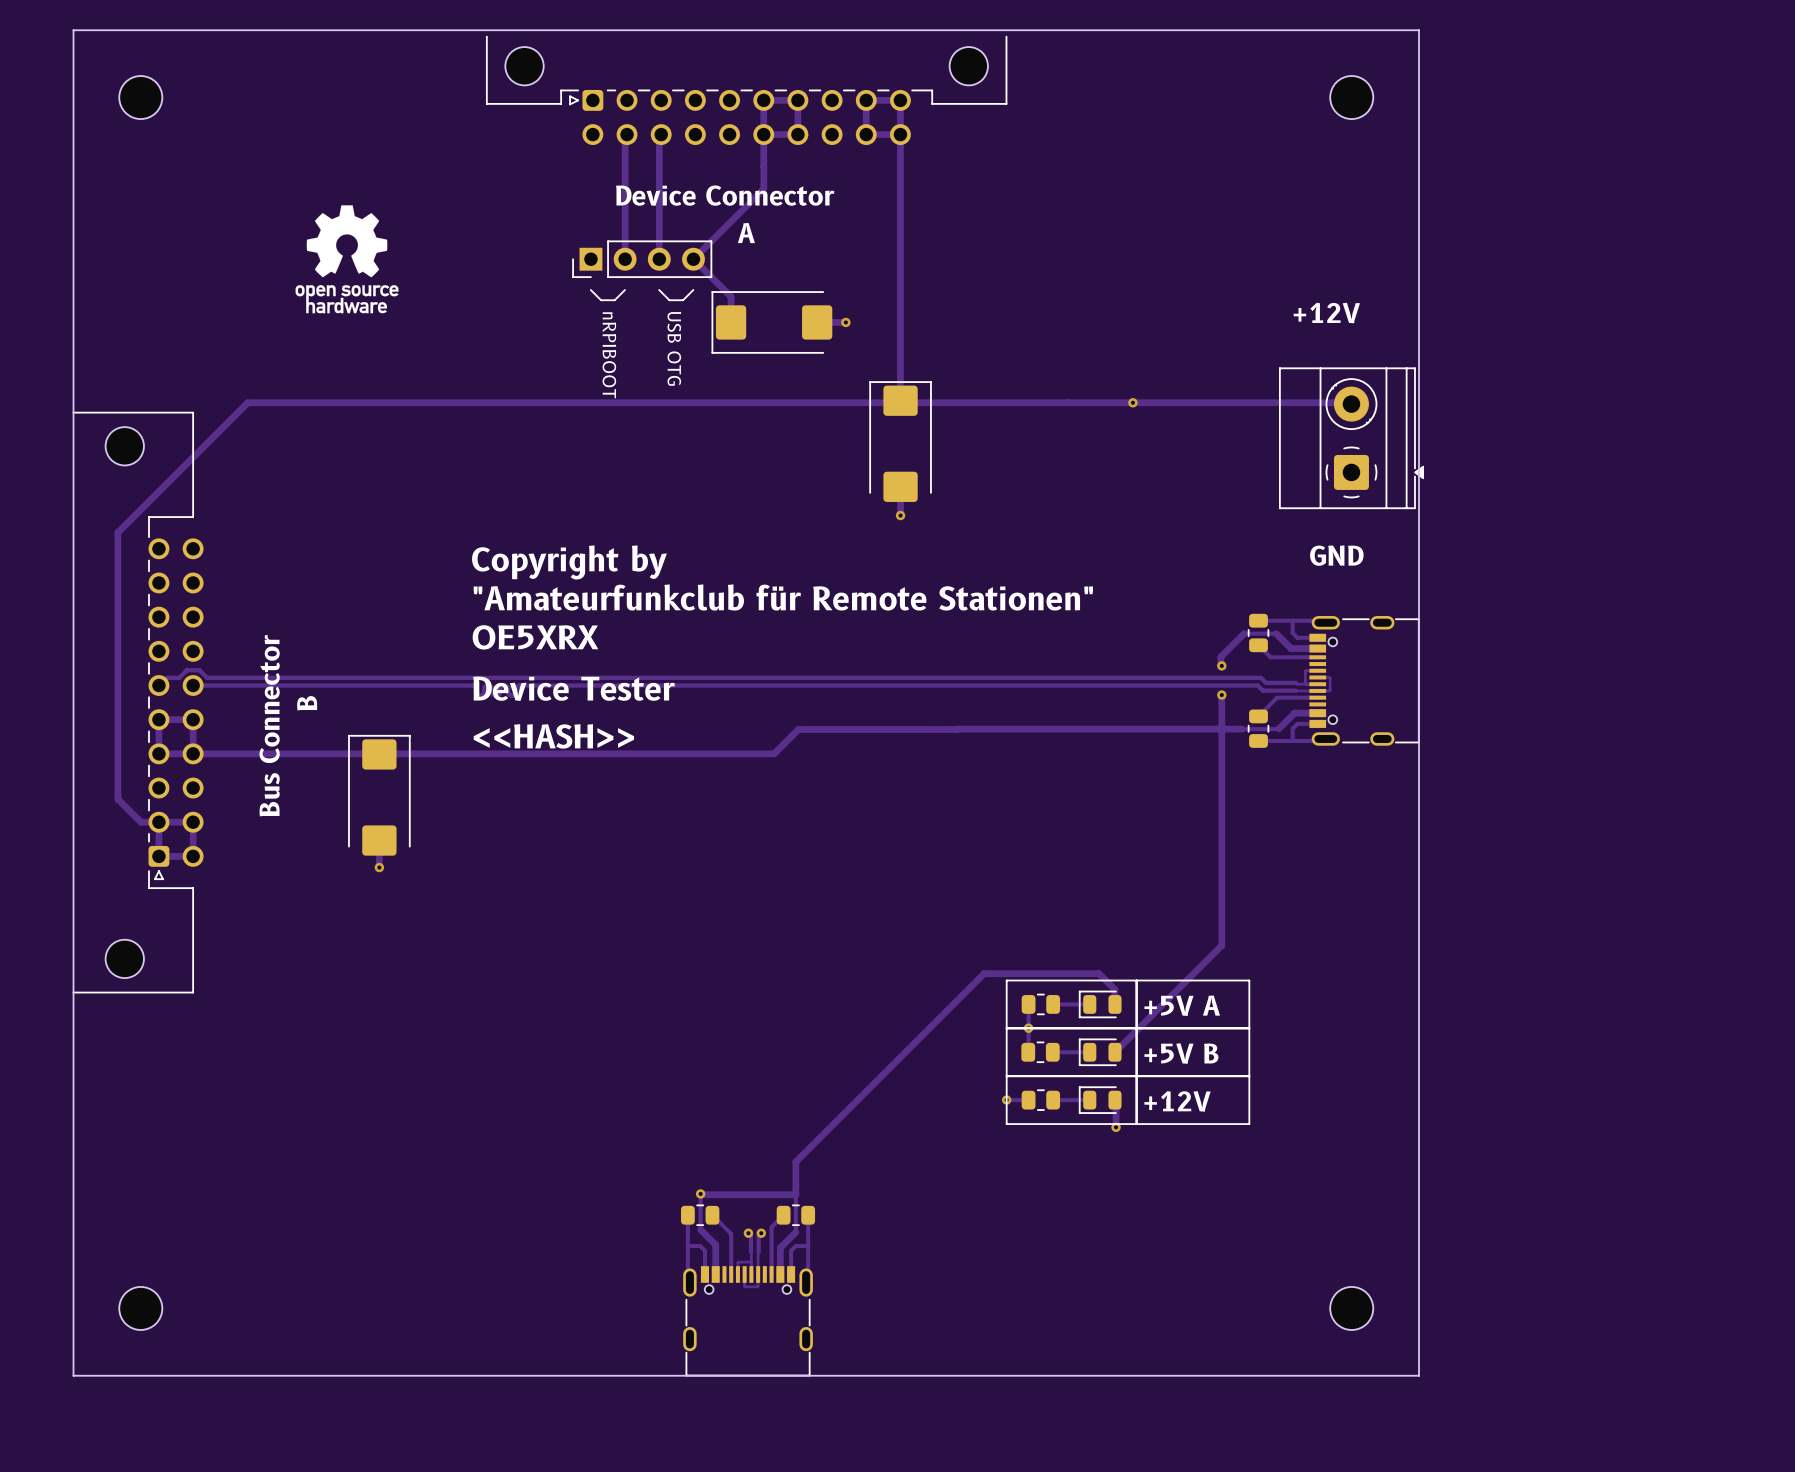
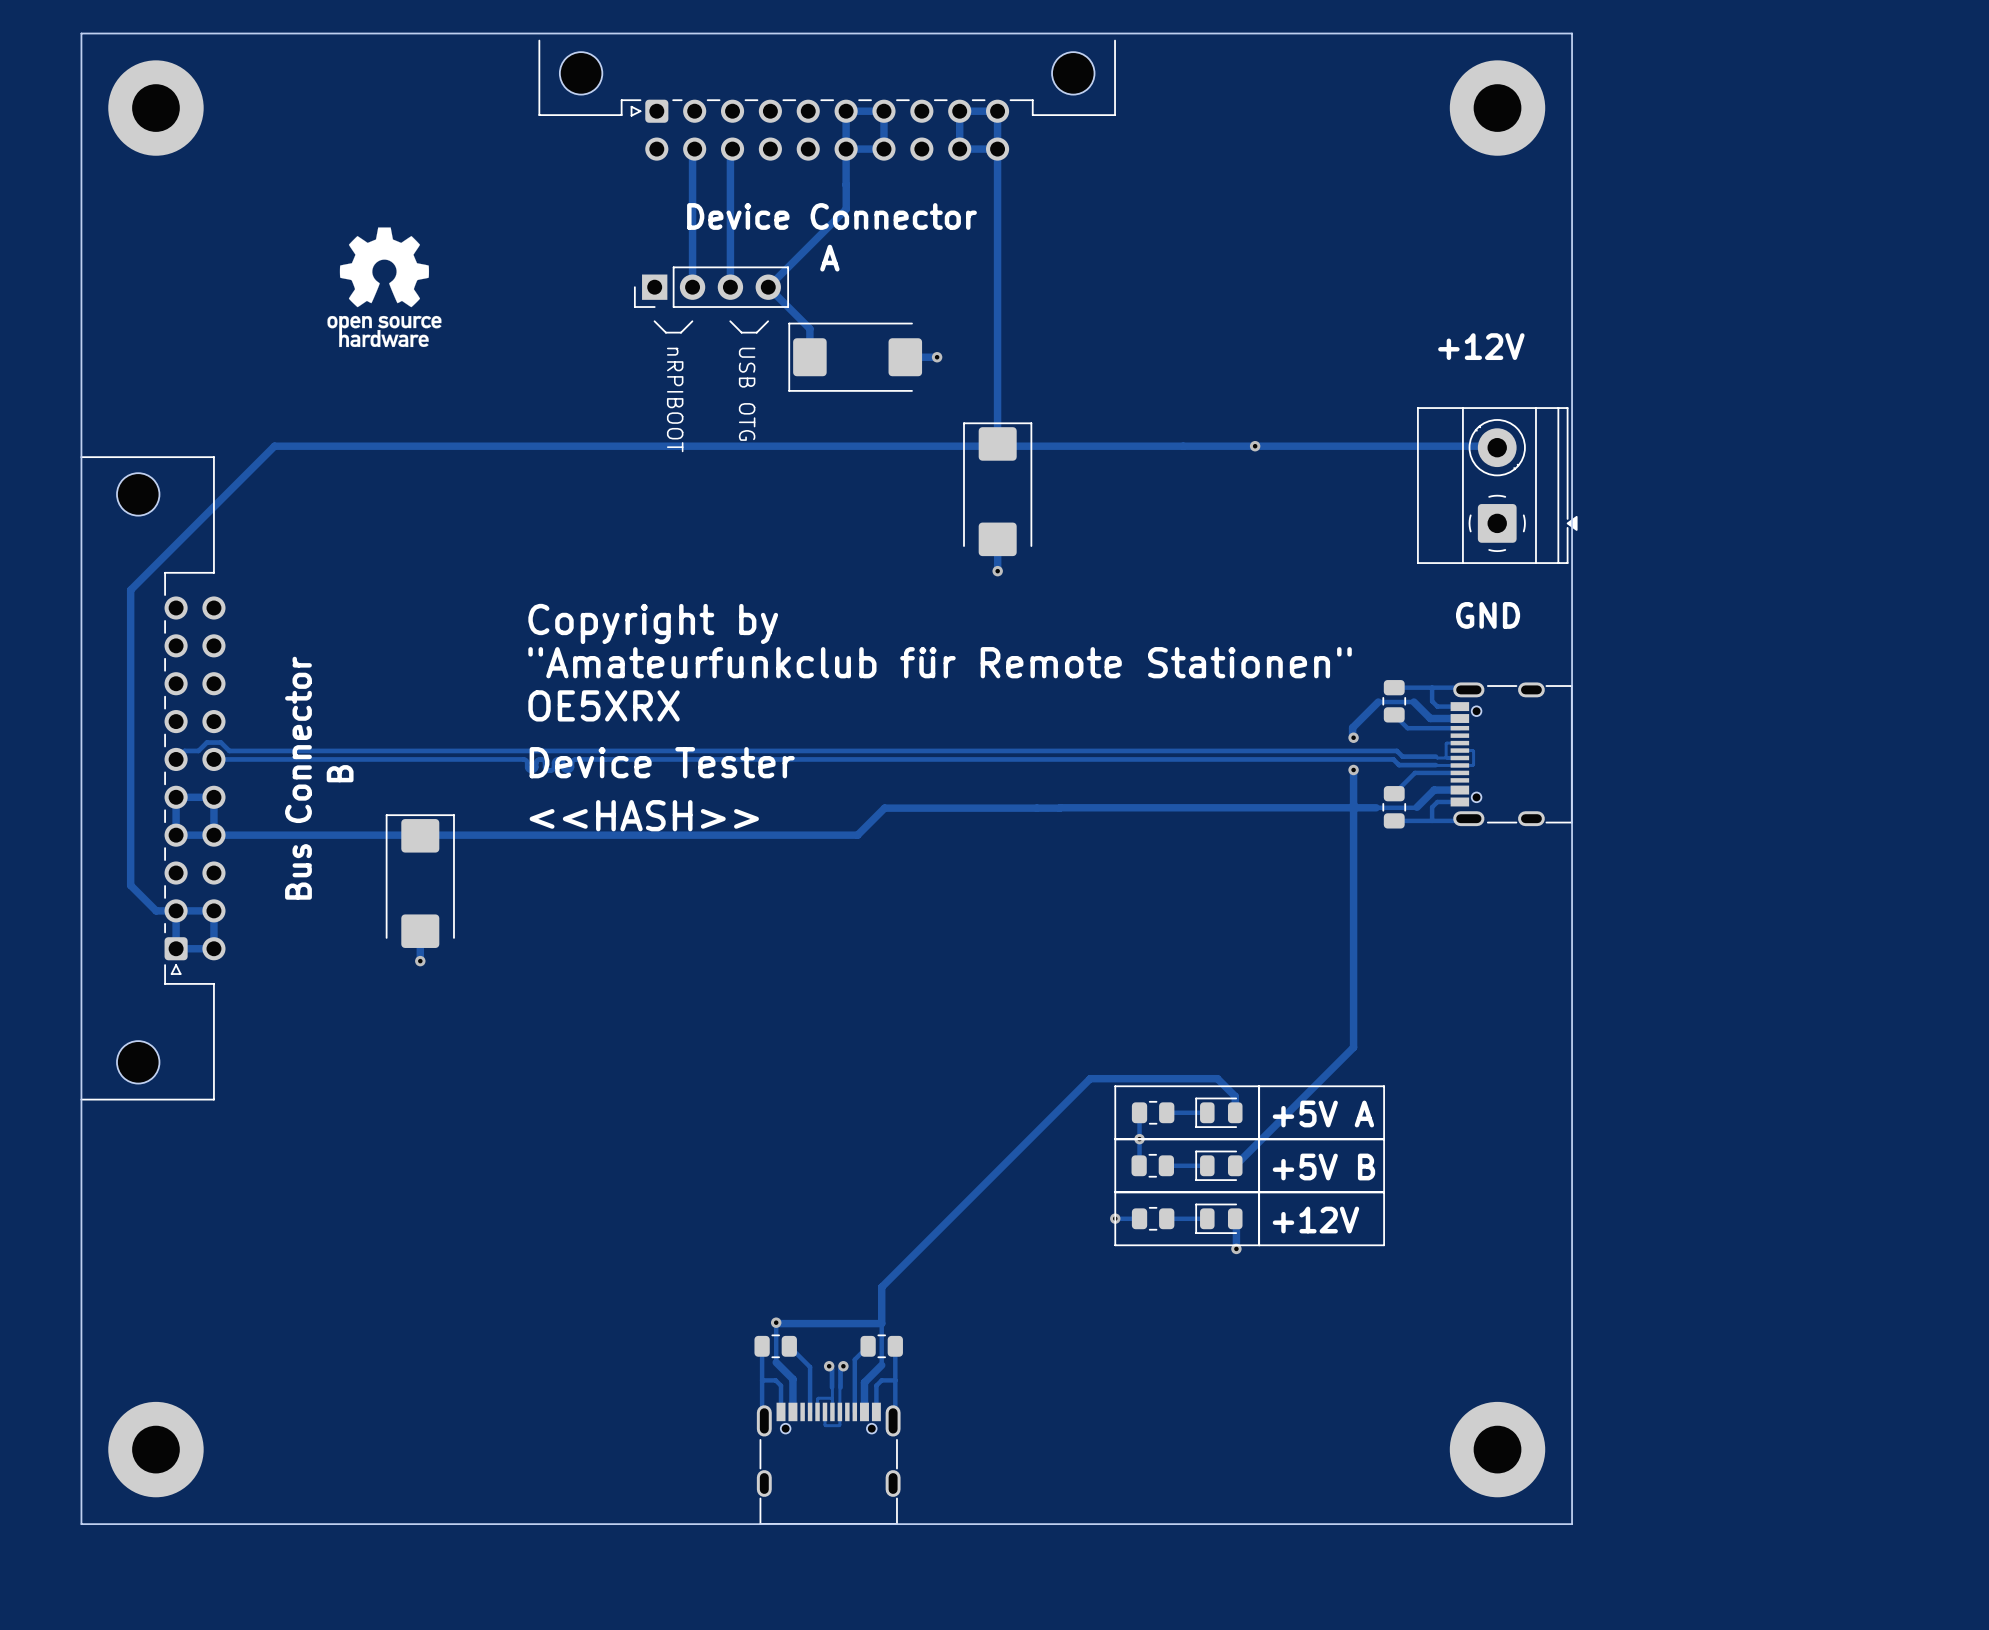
part footprint: [119, 76, 163, 120] -> [108, 60, 204, 156]
part footprint: [1330, 76, 1374, 120] -> [1449, 60, 1546, 156]
part footprint: [119, 1286, 163, 1330] -> [108, 1401, 204, 1498]
part footprint: [1330, 1286, 1374, 1330] -> [1449, 1401, 1546, 1498]

